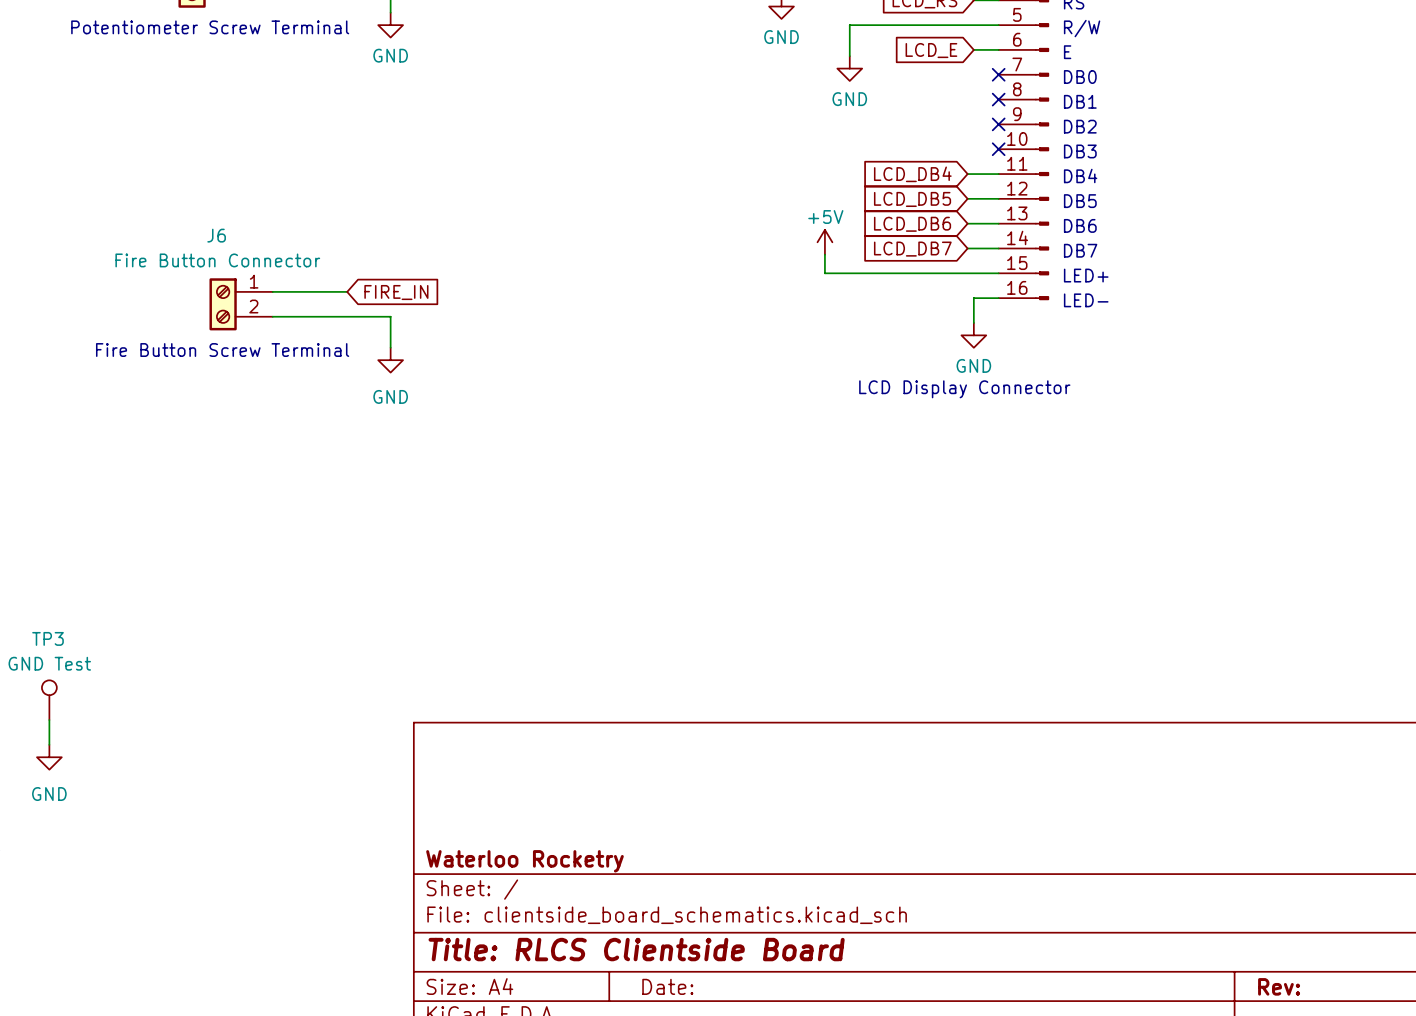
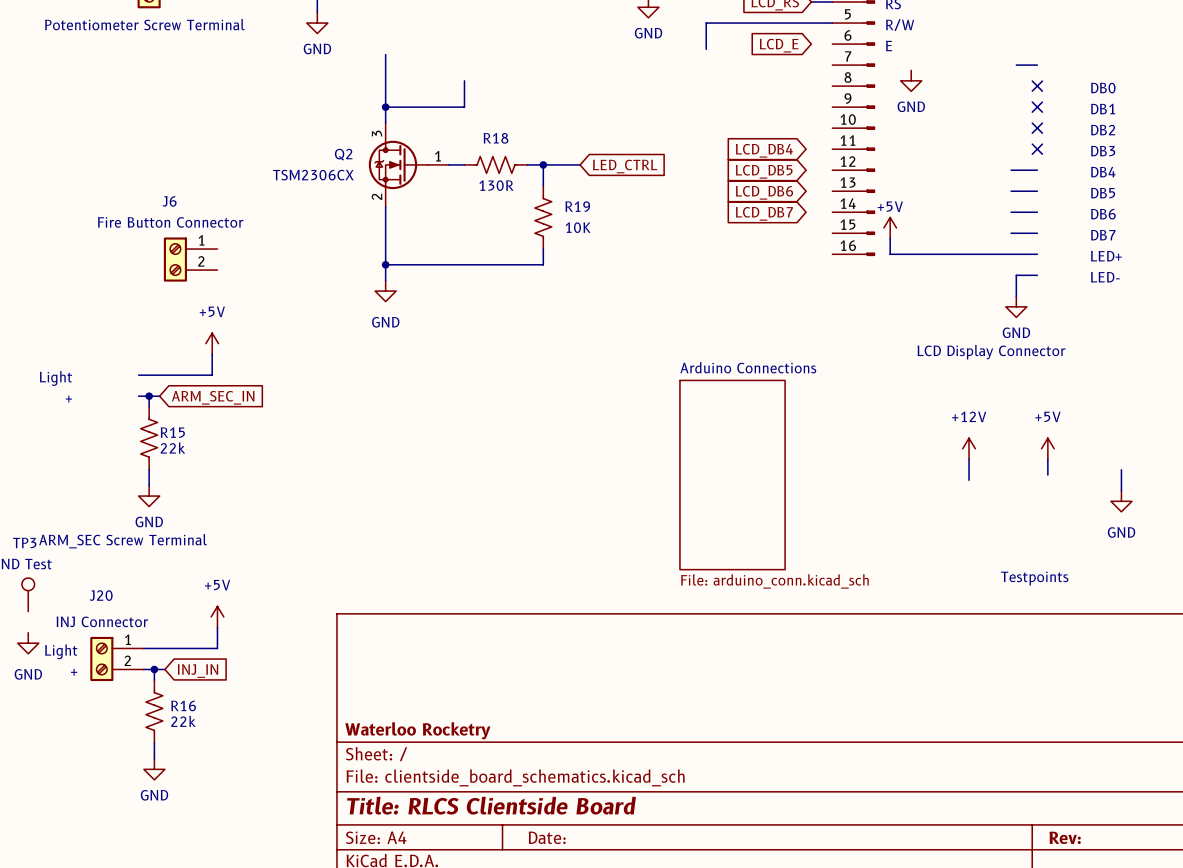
wire: (973, 49) (998, 49) -> (1016, 65) (1037, 65)
wire: none -> (385, 54) (385, 122)
power symbol: GND (849, 68) -> none
no-connect mark: (998, 74) -> none
text position: DB0 (1080, 77) -> DB0 (1103, 88)
wire: none -> (464, 80) (464, 107) (385, 107)
power symbol: none -> GND (911, 80)
no-connect mark: (998, 99) -> none
no-connect mark: none -> (1037, 86)
text position: DB1 (1080, 101) -> DB1 (1103, 109)
junction: none -> (385, 107)
no-connect mark: (998, 124) -> none
no-connect mark: none -> (1037, 107)
text position: DB2 (1080, 126) -> DB2 (1103, 130)
no-connect mark: (998, 149) -> none
no-connect mark: none -> (1037, 128)
text position: DB3 (1080, 151) -> DB3 (1103, 151)
wire: (967, 174) (998, 174) -> (1011, 170) (1037, 170)
no-connect mark: none -> (1037, 149)
text position: DB4 (1080, 175) -> DB4 (1103, 172)
Q2: none -> TSM2306CX (408, 164)
wire: none -> (448, 164) (464, 164)
R18: none -> 130R (496, 164)
wire: none -> (527, 164) (580, 164)
wire: none -> (543, 164) (543, 185)
junction: none -> (543, 164)
global label: none -> LED_CTRL (625, 166)
wire: (967, 198) (998, 198) -> (1011, 191) (1037, 191)
text position: DB5 (1080, 201) -> DB5 (1103, 193)
wire: (967, 223) (998, 223) -> (1011, 212) (1037, 212)
text position: DB6 (1080, 225) -> DB6 (1103, 214)
wire: none -> (385, 206) (385, 280)
power symbol: +5V (824, 242) -> none
wire: (967, 248) (998, 248) -> (1011, 233) (1037, 233)
text position: DB7 (1080, 250) -> DB7 (1103, 235)
R19: none -> 10K (543, 217)
wire: (824, 254) (824, 273) (998, 273) -> (890, 238) (890, 254) (1037, 254)
power symbol: none -> +5V (890, 228)
text position: LED+ (1086, 275) -> LED+ (1106, 256)
wire: (272, 291) (347, 291) -> none
wire: none -> (543, 249) (543, 264) (385, 264)
global label: FIRE_IN (396, 292) -> none
wire: (998, 298) (973, 298) (973, 322) -> (1037, 275) (1016, 275) (1016, 296)
text position: LED- (1086, 300) -> LED- (1105, 277)
junction: none -> (385, 264)
wire: (272, 316) (390, 316) (390, 347) -> none
power symbol: GND (973, 335) -> none
text: Fire Button Screw Terminal (222, 350) -> none
power symbol position: GND (390, 360) -> GND (385, 291)
power symbol: none -> GND (1016, 306)
text position: LCD Display Connector (964, 389) -> LCD Display Connector (991, 352)
power symbol: none -> +5V (212, 343)
wire: none -> (212, 354) (212, 375) (138, 375)
text: none -> Light (56, 378)
wire: none -> (138, 396) (159, 396)
wire: none -> (149, 396) (149, 406)
junction: none -> (149, 396)
global label: none -> ARM_SEC_IN (213, 397)
text: none -> + (68, 399)
R15: none -> 22k (149, 438)
power symbol: none -> +12V (969, 448)
power symbol: none -> +5V (1047, 448)
wire: none -> (969, 459) (969, 480)
wire: none -> (1047, 459) (1047, 475)
wire: none -> (149, 469) (149, 485)
wire: none -> (1121, 469) (1121, 490)
sheet Arduino Connections: none -> File: arduino_conn.kicad_sch (732, 475)
power symbol: none -> GND (149, 496)
power symbol: none -> GND (1121, 501)
text: none -> ARM_SEC Screw Terminal (123, 541)
text: none -> Testpoints (1034, 578)
wire: (49, 720) (49, 744) -> none
power symbol: none -> +5V (217, 616)
wire: none -> (217, 627) (217, 648) (143, 648)
text: none -> Light (61, 651)
J20: none -> INJ Connector (117, 658)
wire: none -> (143, 669) (164, 669)
wire: none -> (154, 669) (154, 680)
junction: none -> (154, 669)
global label: none -> INJ_IN (198, 671)
text: none -> + (74, 672)
R16: none -> 22k (154, 711)
wire: none -> (154, 743) (154, 758)
power symbol: none -> GND (154, 769)

